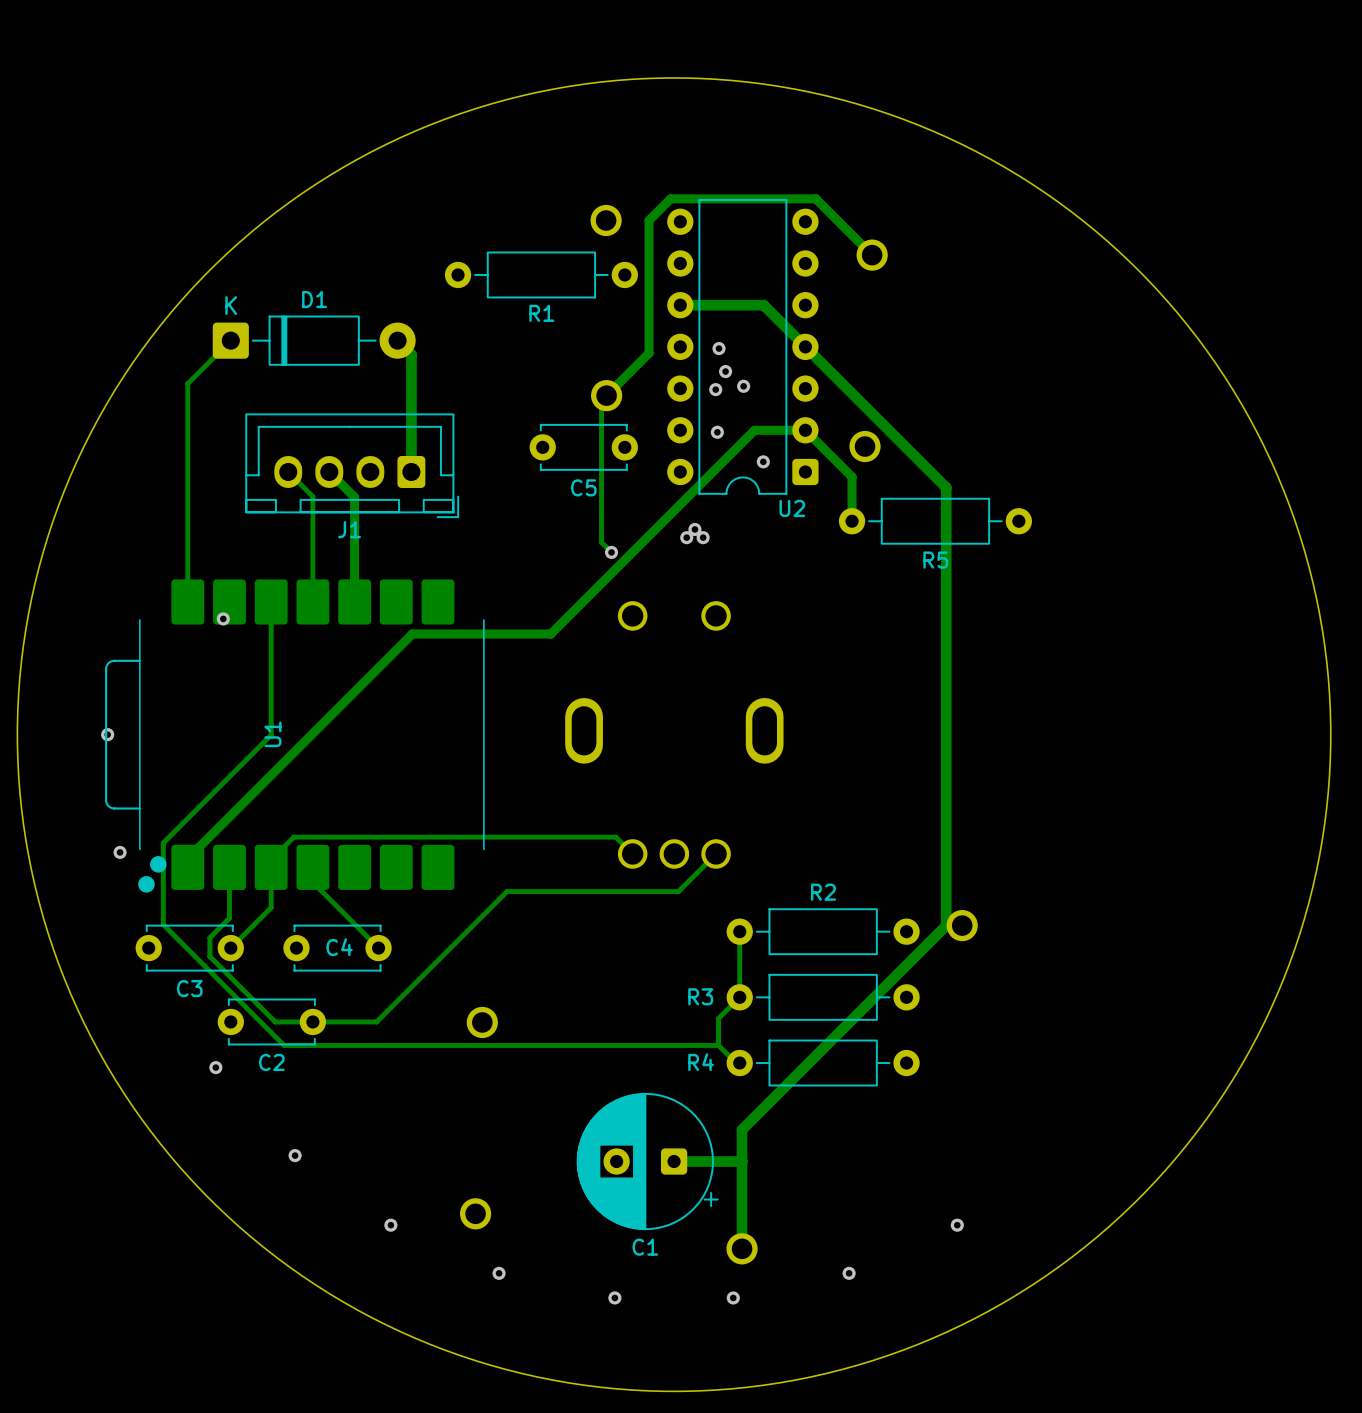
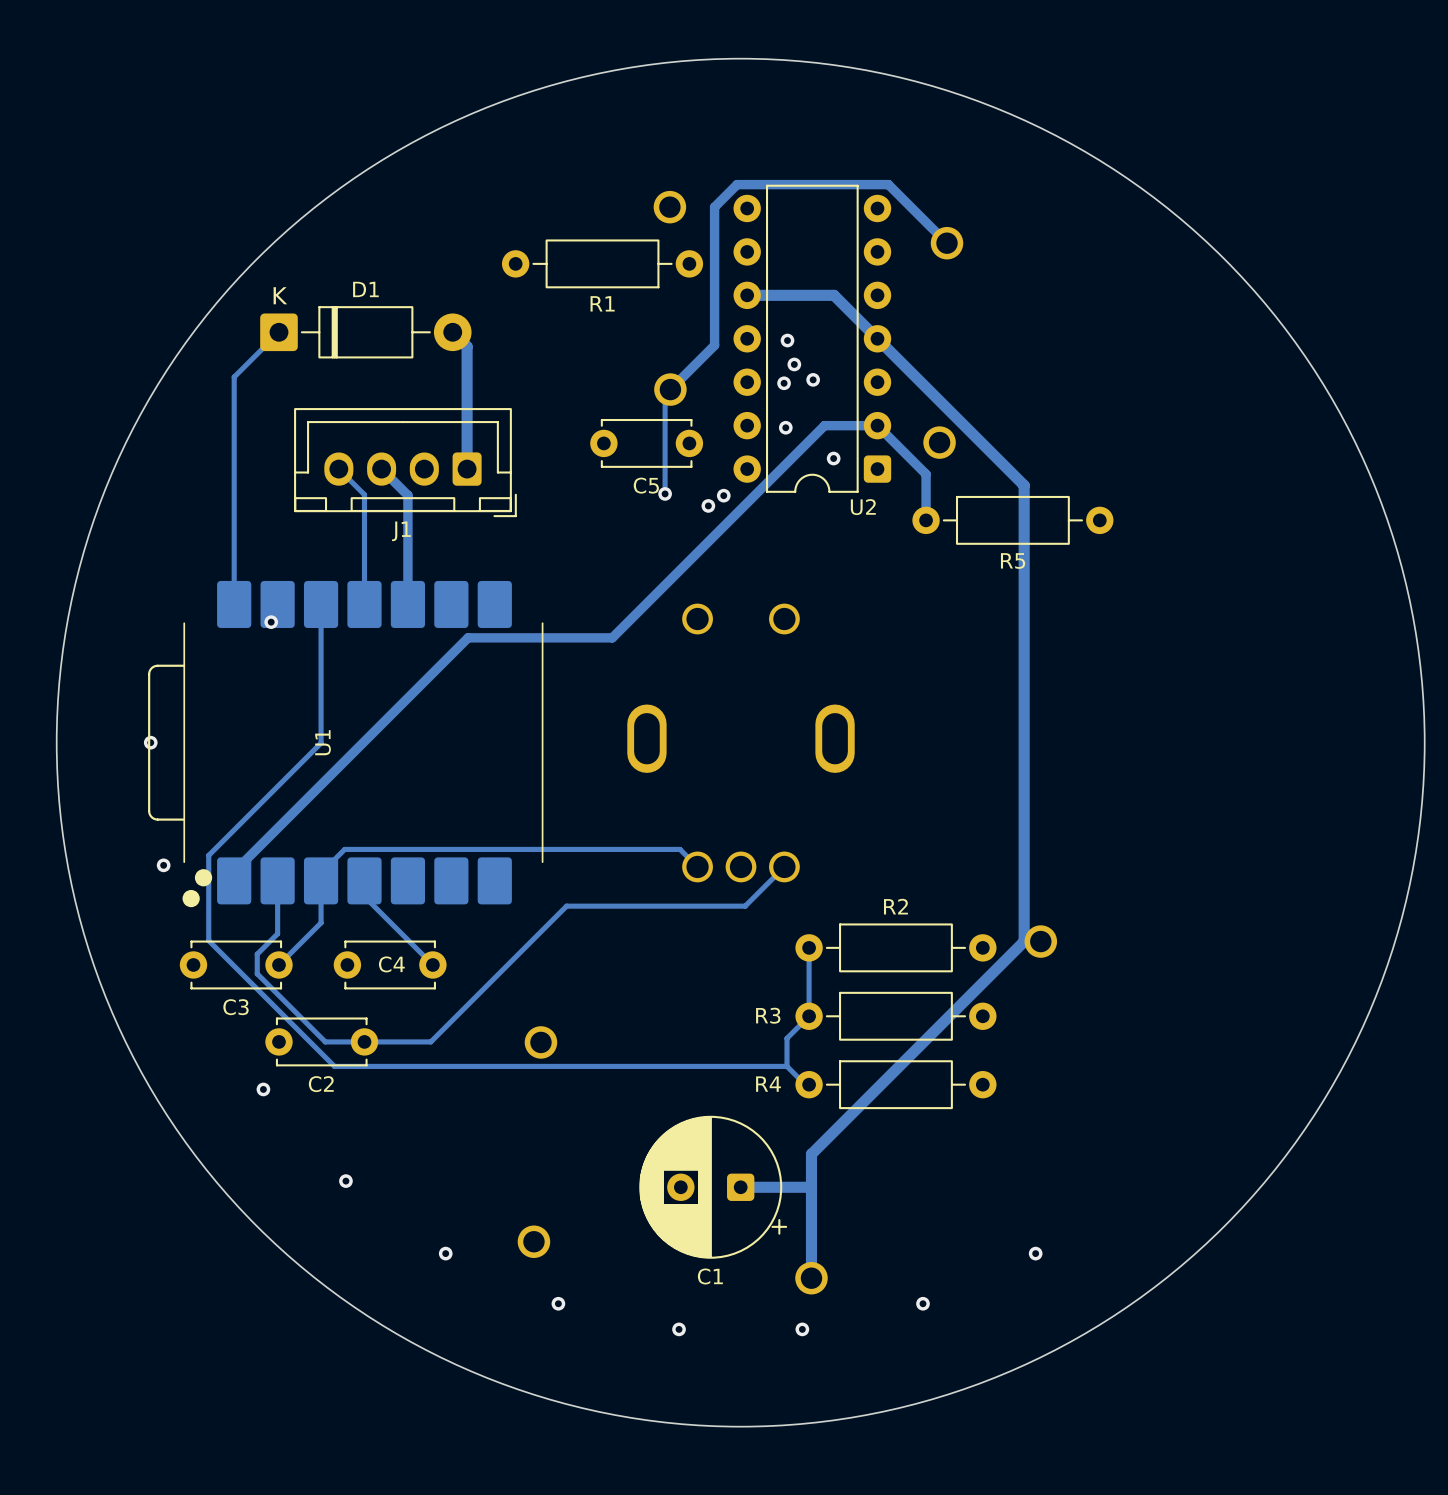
track: (601, 495) (601, 542) (611, 552) -> none
via: none -> (665, 493)
via: none -> (723, 495)
via: none -> (708, 505)
via: (694, 529) -> none
via: (686, 537) -> none
via: (703, 537) -> none
via: (611, 552) -> none

